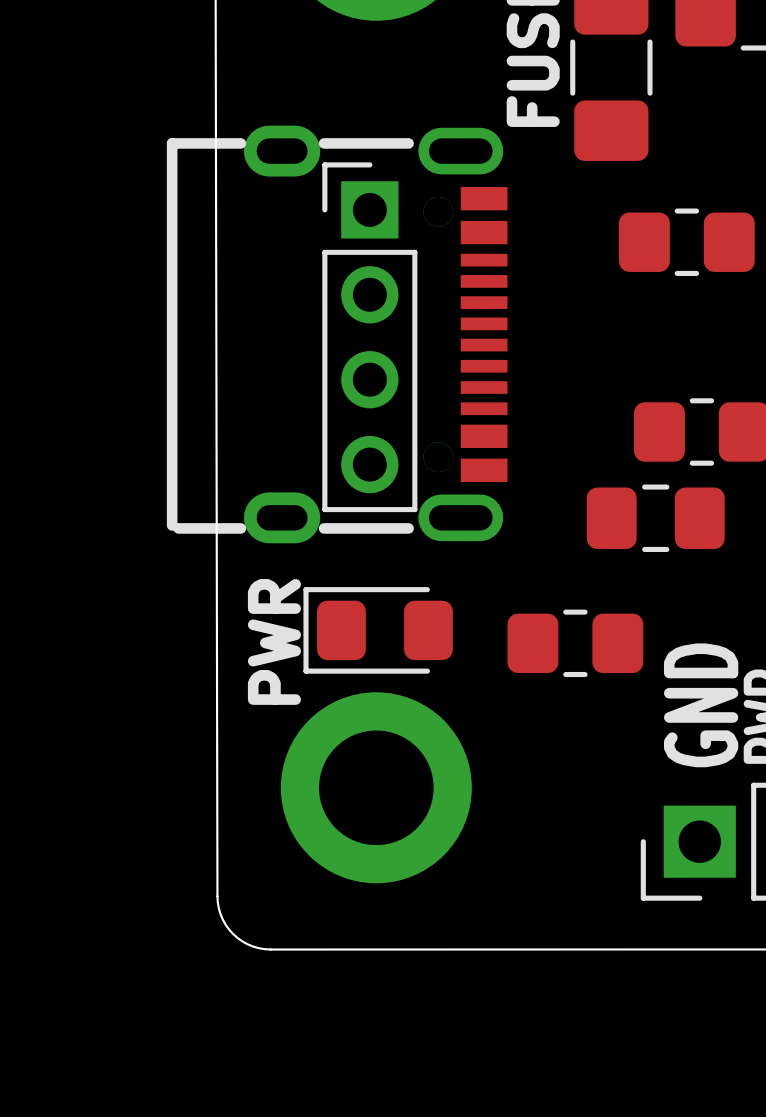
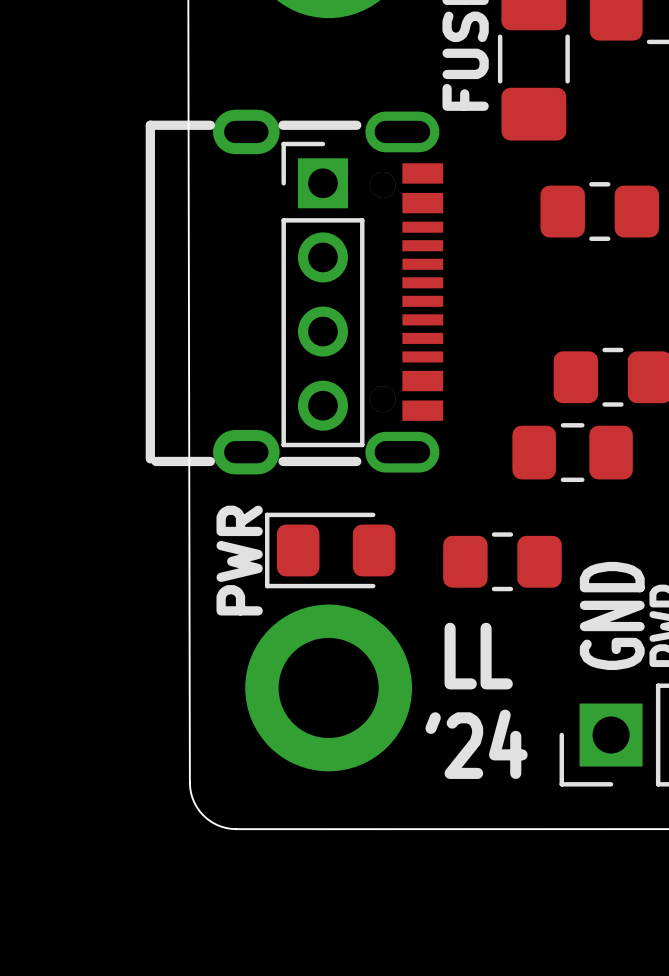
text: none -> LL (478, 656)
text: none -> '24 (476, 744)

